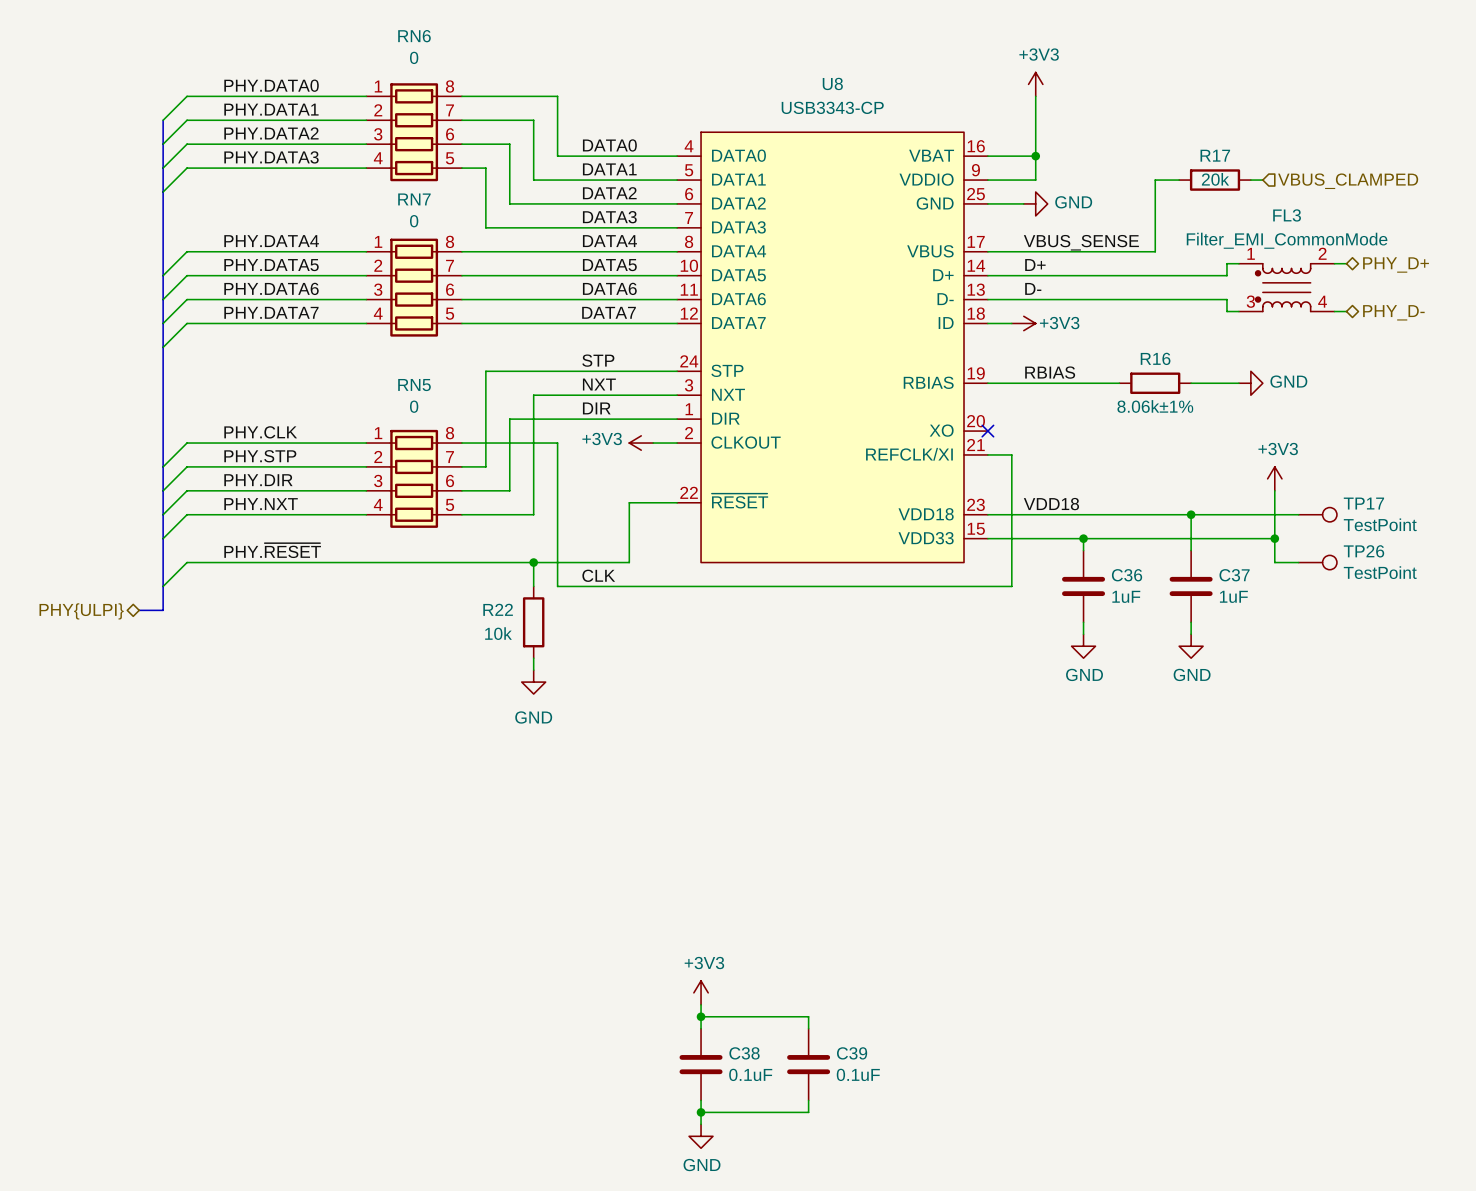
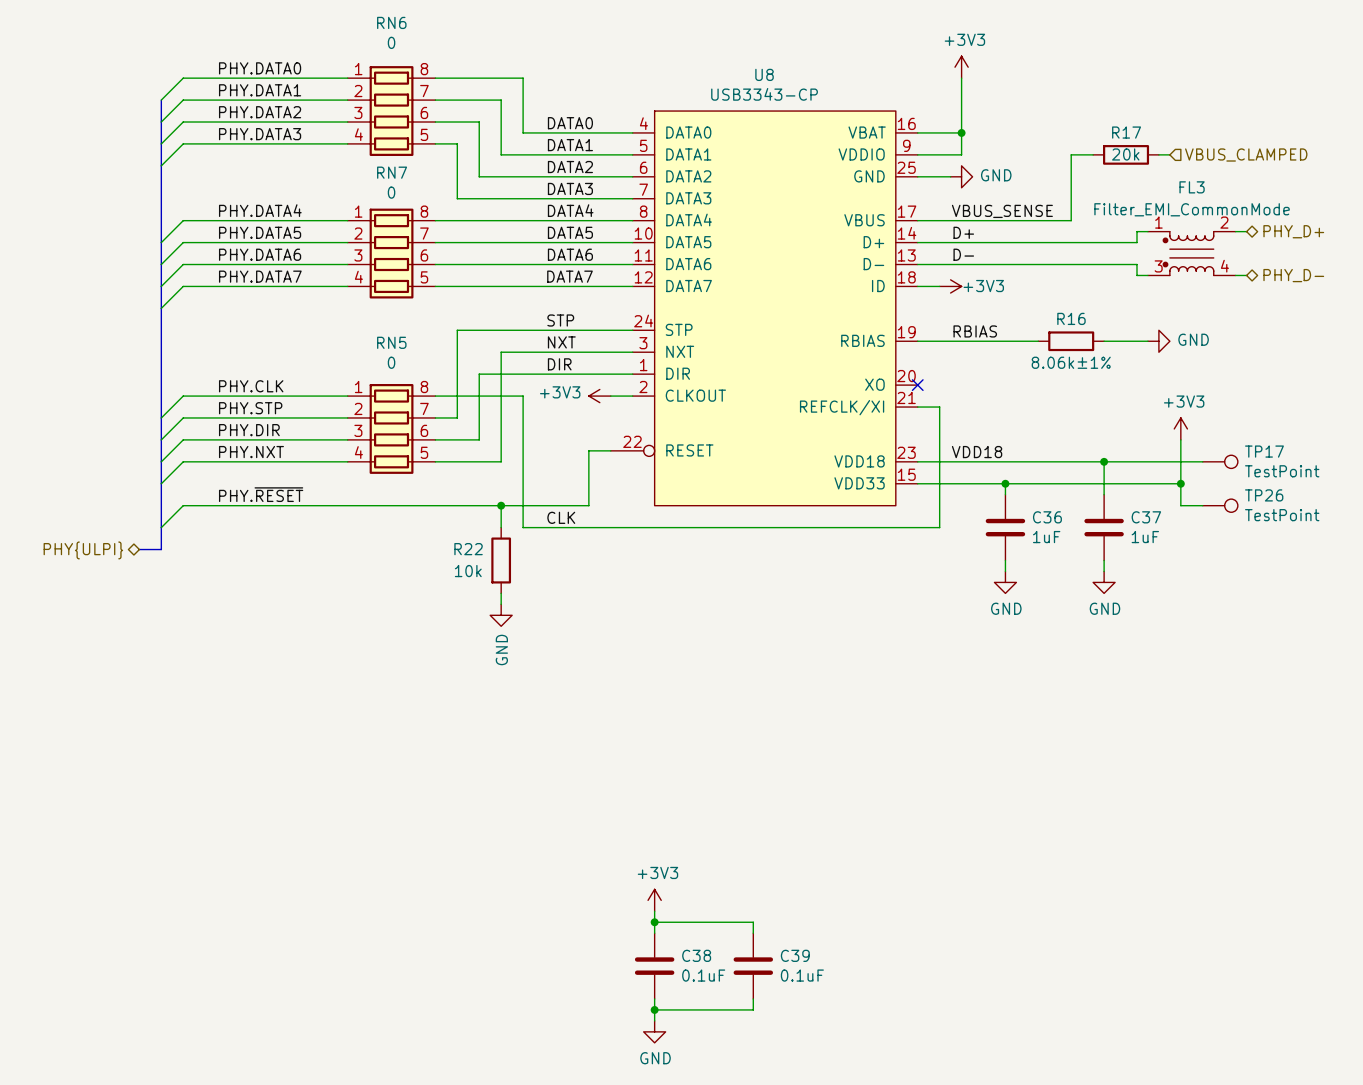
U8 symbol: [677, 132, 988, 563] -> [610, 111, 918, 506]
power symbol text rotation: 0° (533, 717) -> 90° counterclockwise (501, 649)

